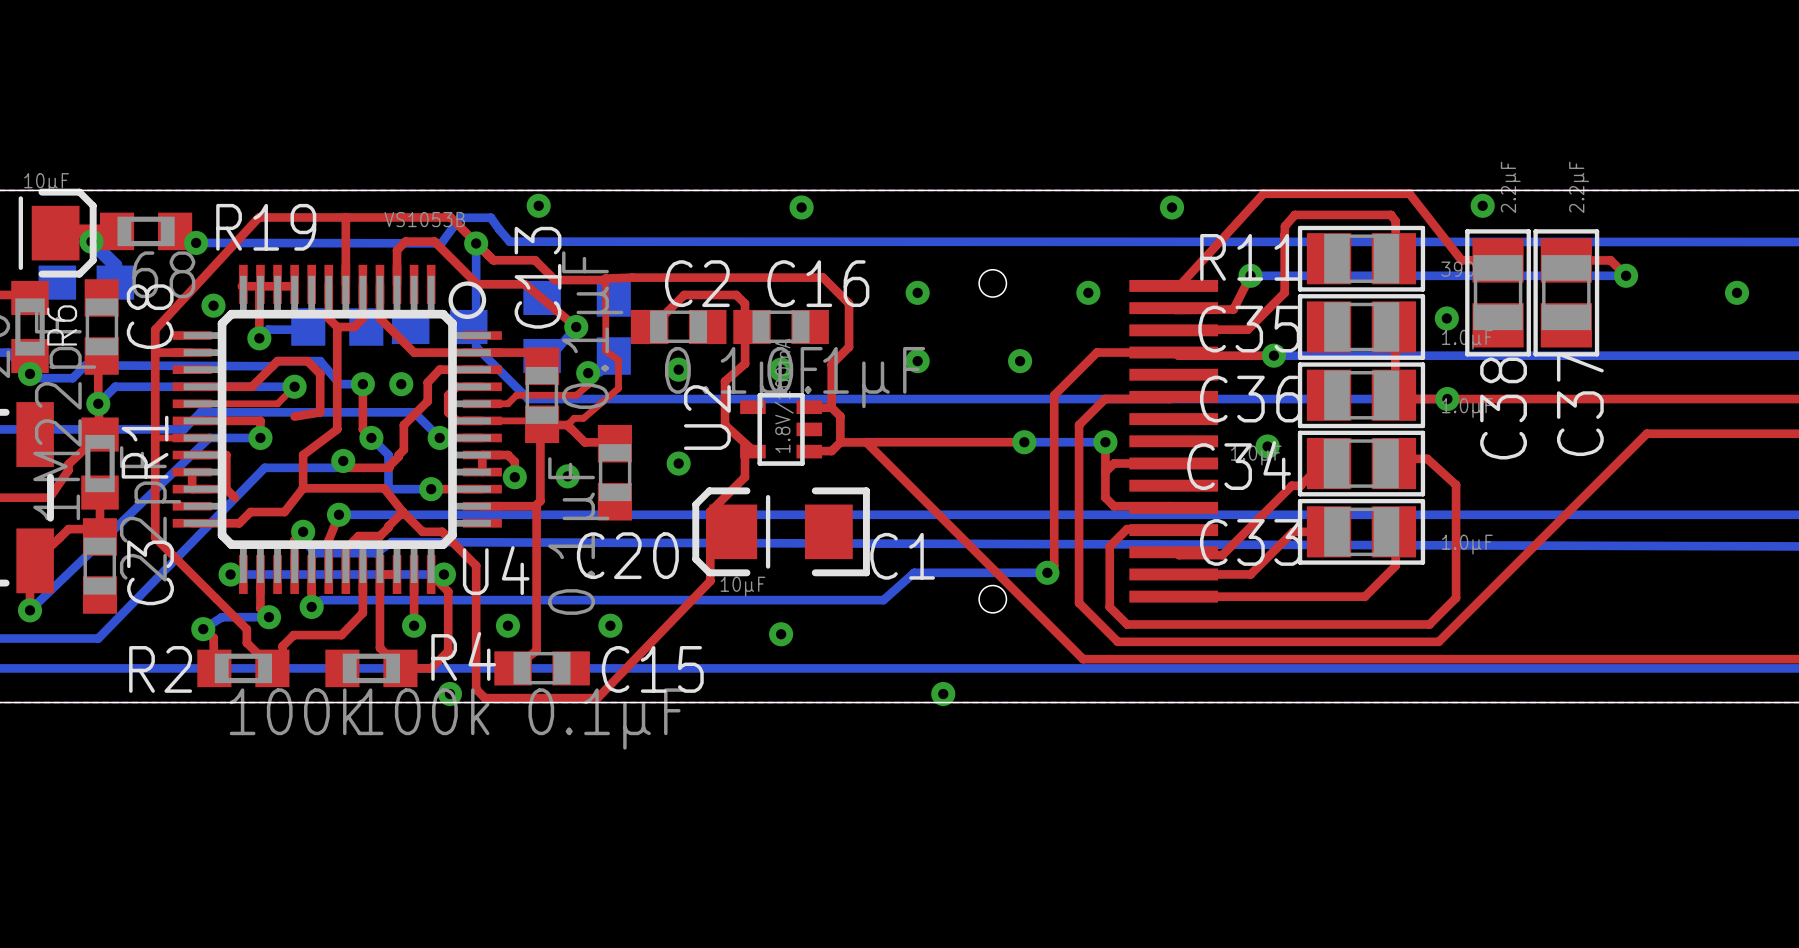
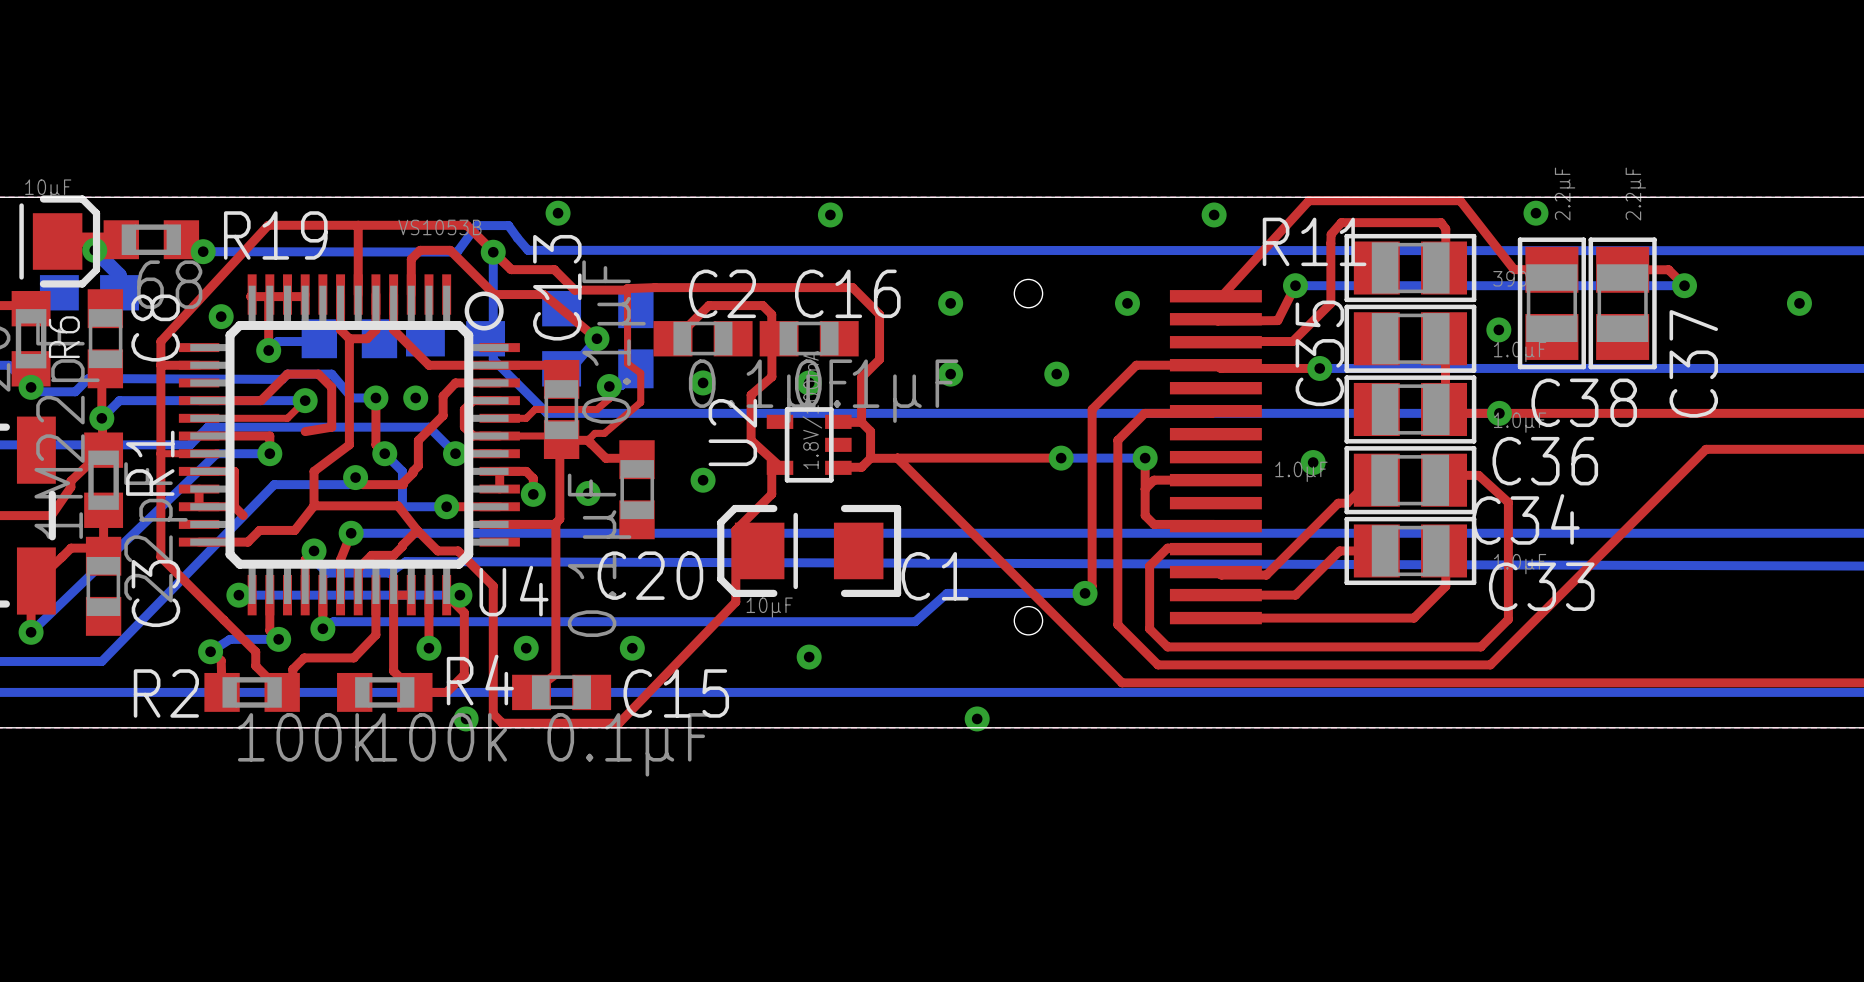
R11 name position: R11 (1250, 257) -> R11 (1314, 241)
C35 name rotation: 0° (1249, 329) -> 90° counterclockwise (1319, 353)
C36 name position: C36 (1250, 399) -> C36 (1545, 461)
C37 name position: C37 (1580, 404) -> C37 (1693, 363)
C38 name rotation: 0° (1503, 408) -> 90° clockwise (1584, 402)
C34 name position: C34 (1239, 465) -> C34 (1525, 519)
C33 name position: C33 (1250, 542) -> C33 (1541, 586)

